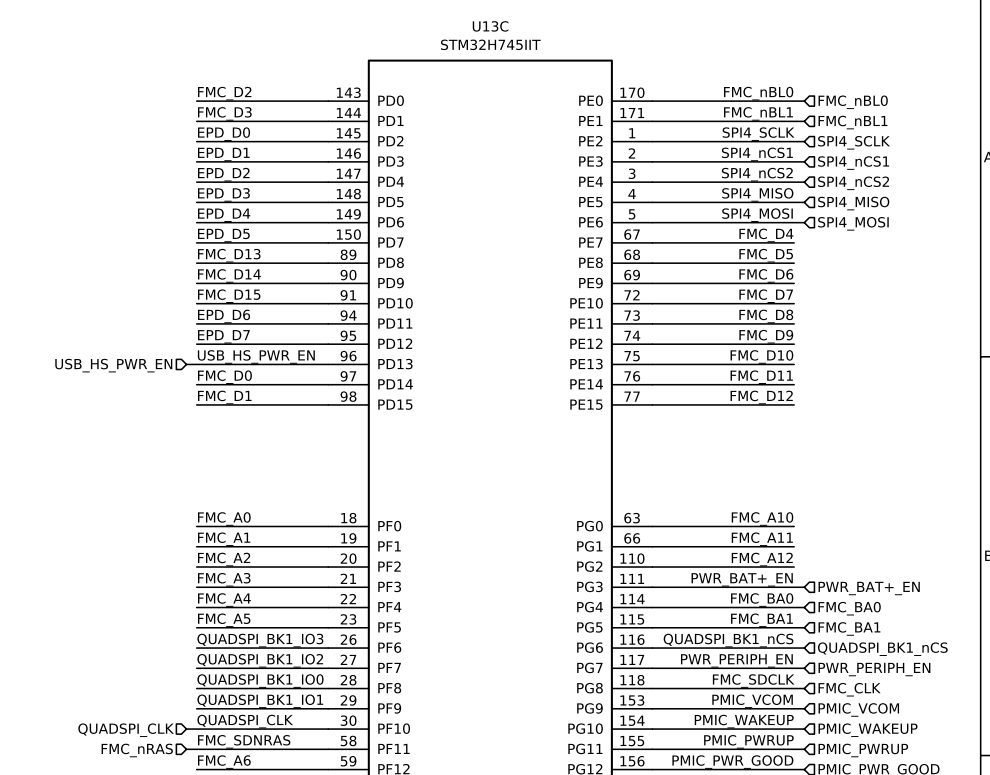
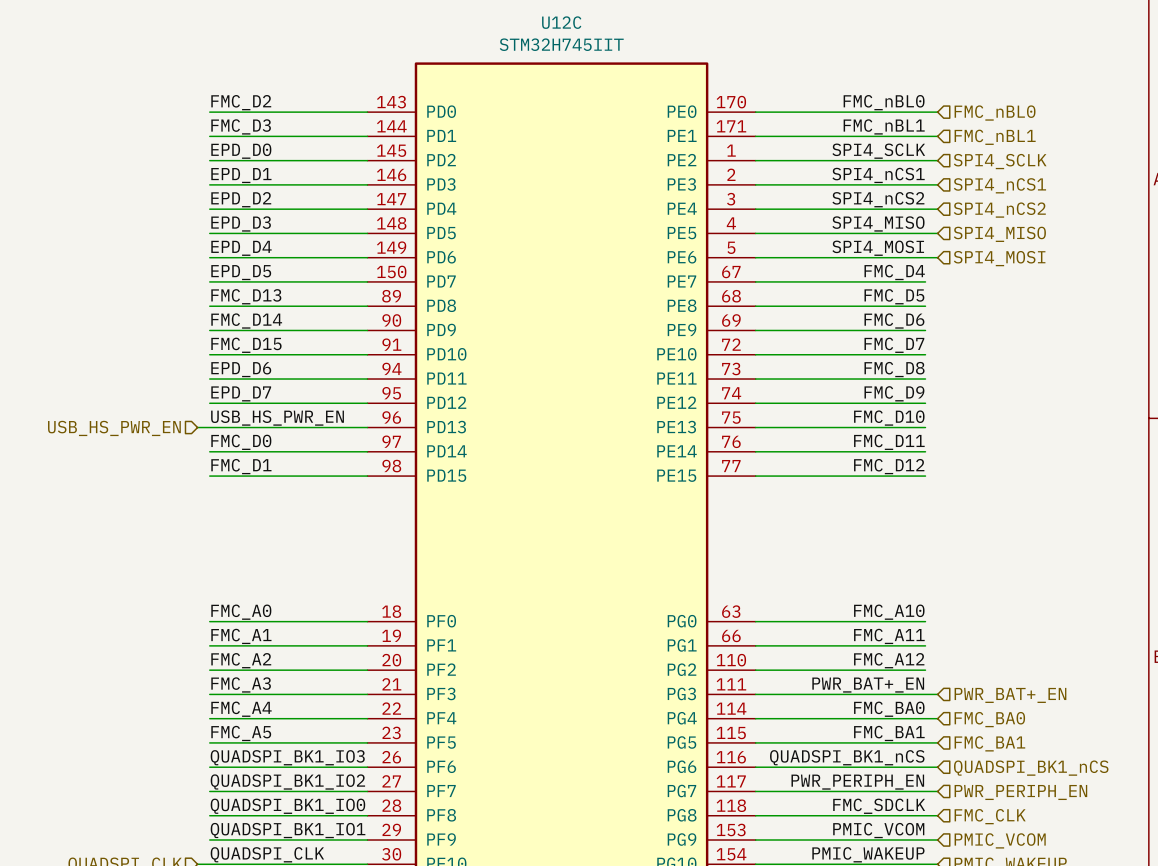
U13C name: U13C (490, 26) -> U12C (561, 22)

